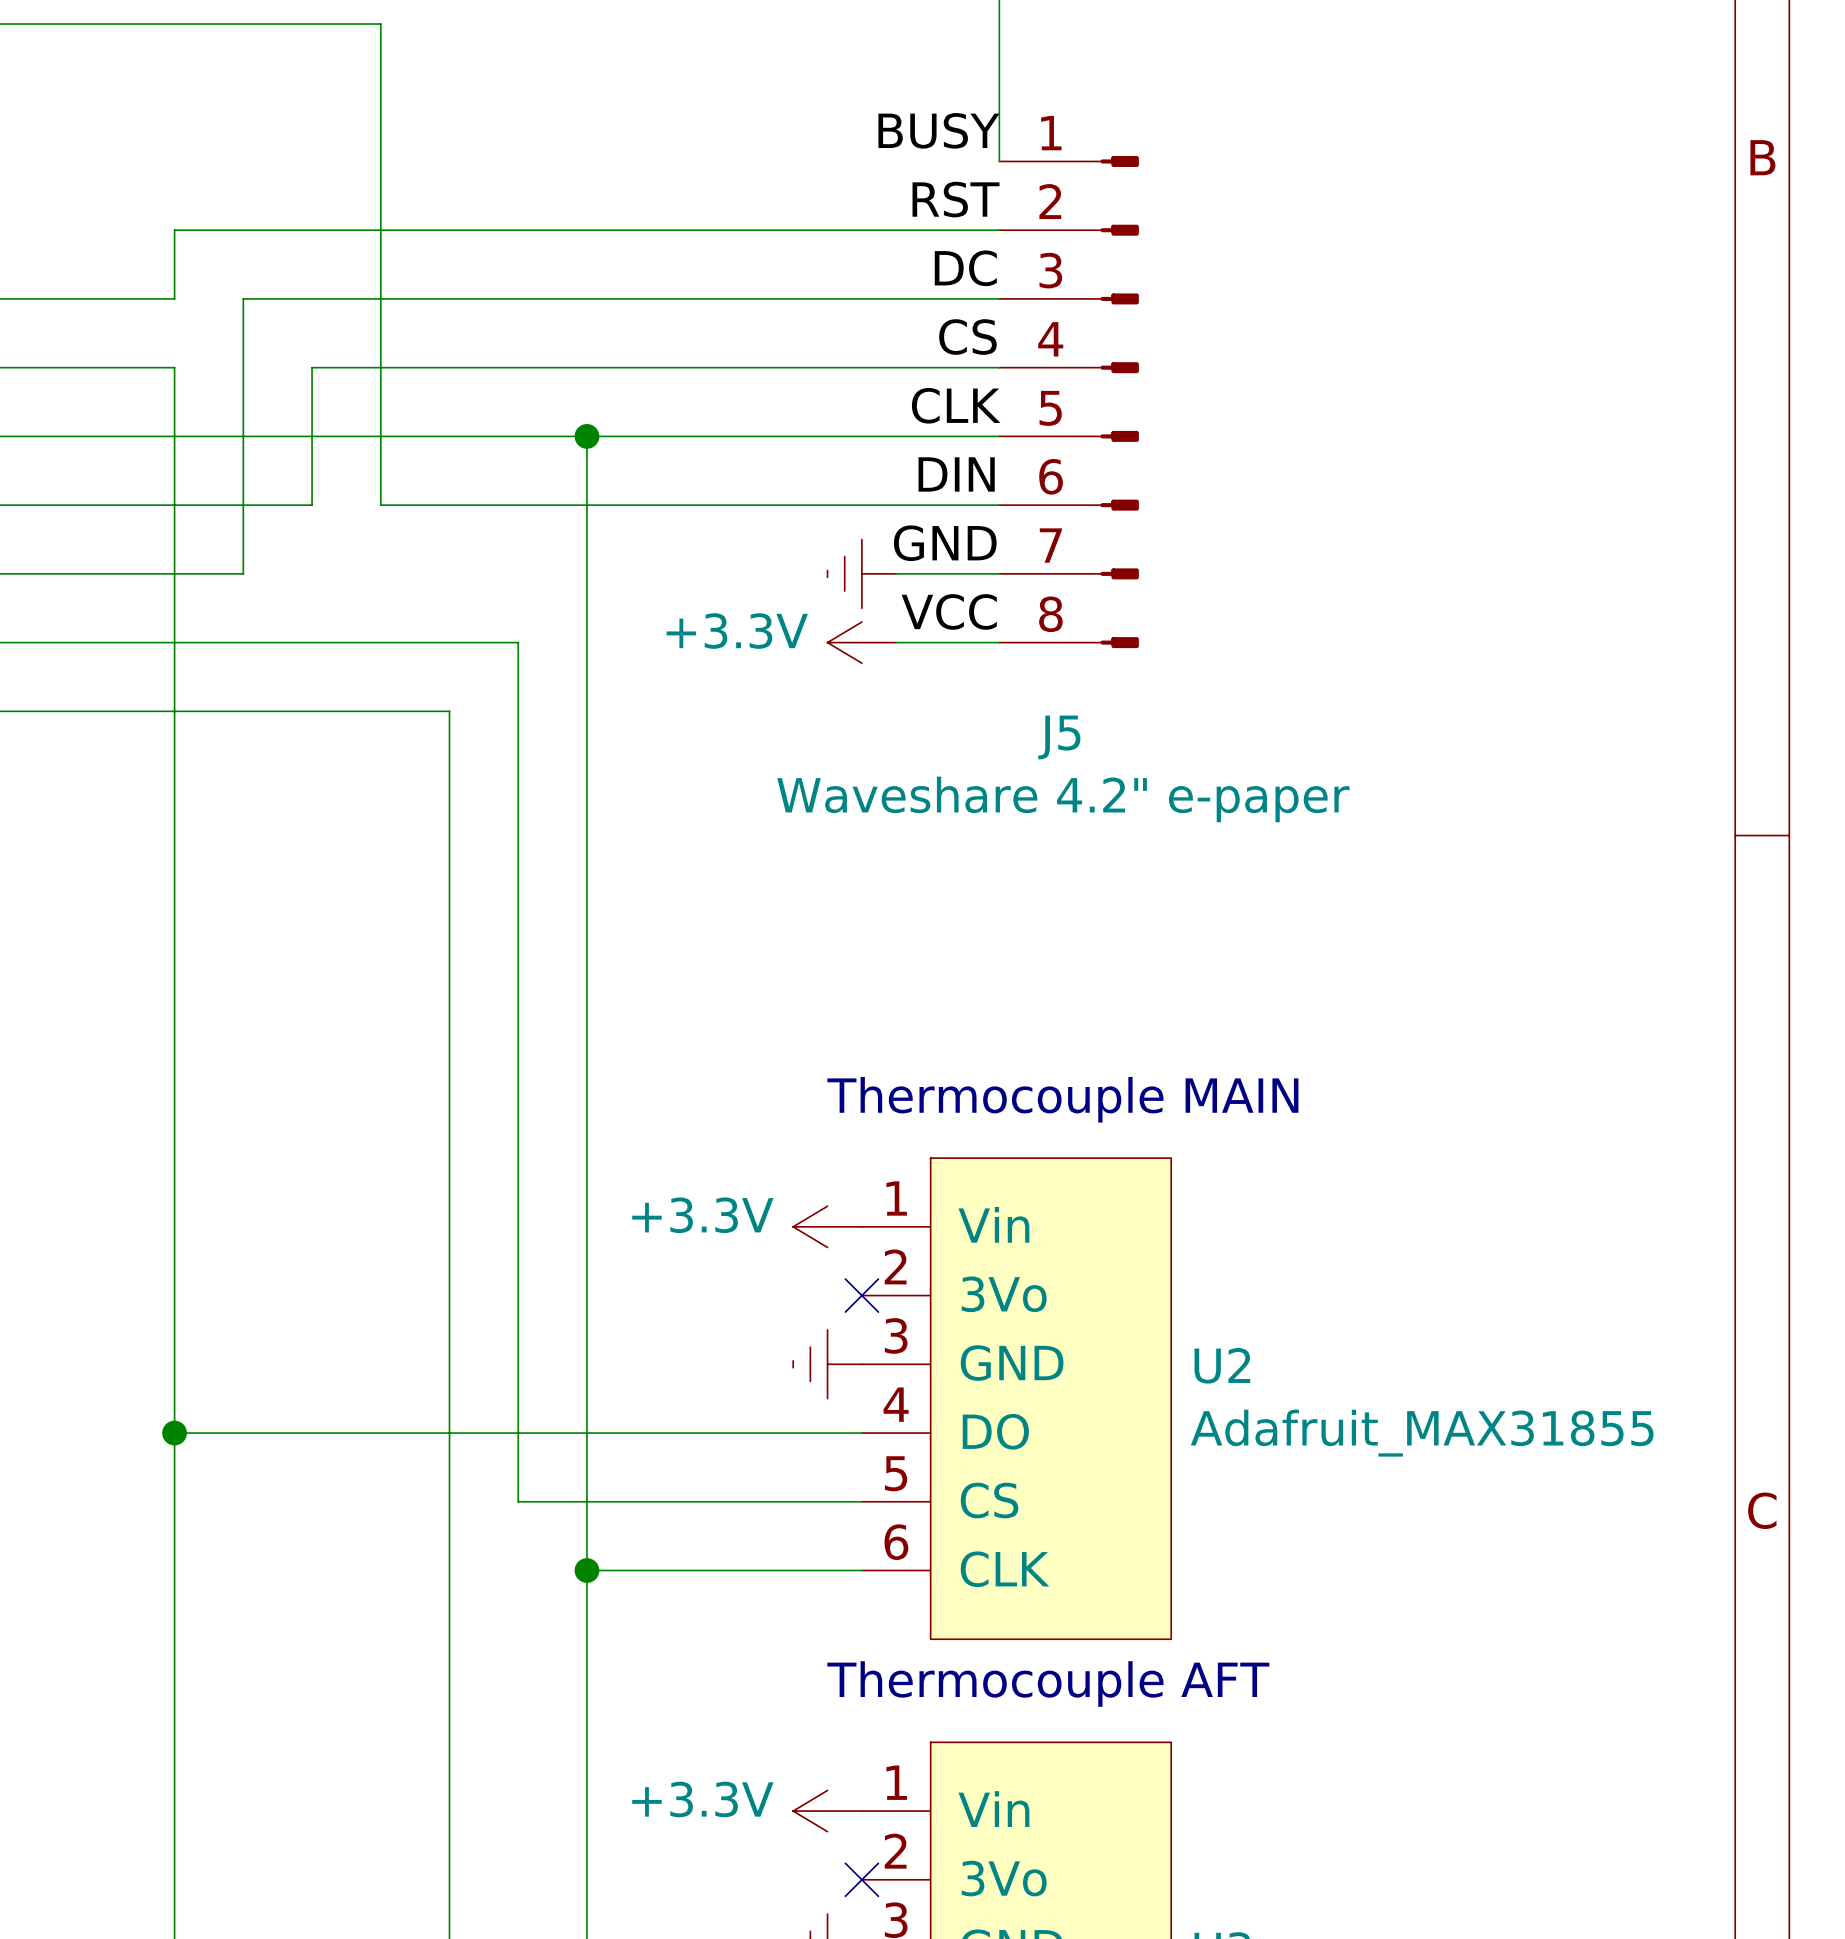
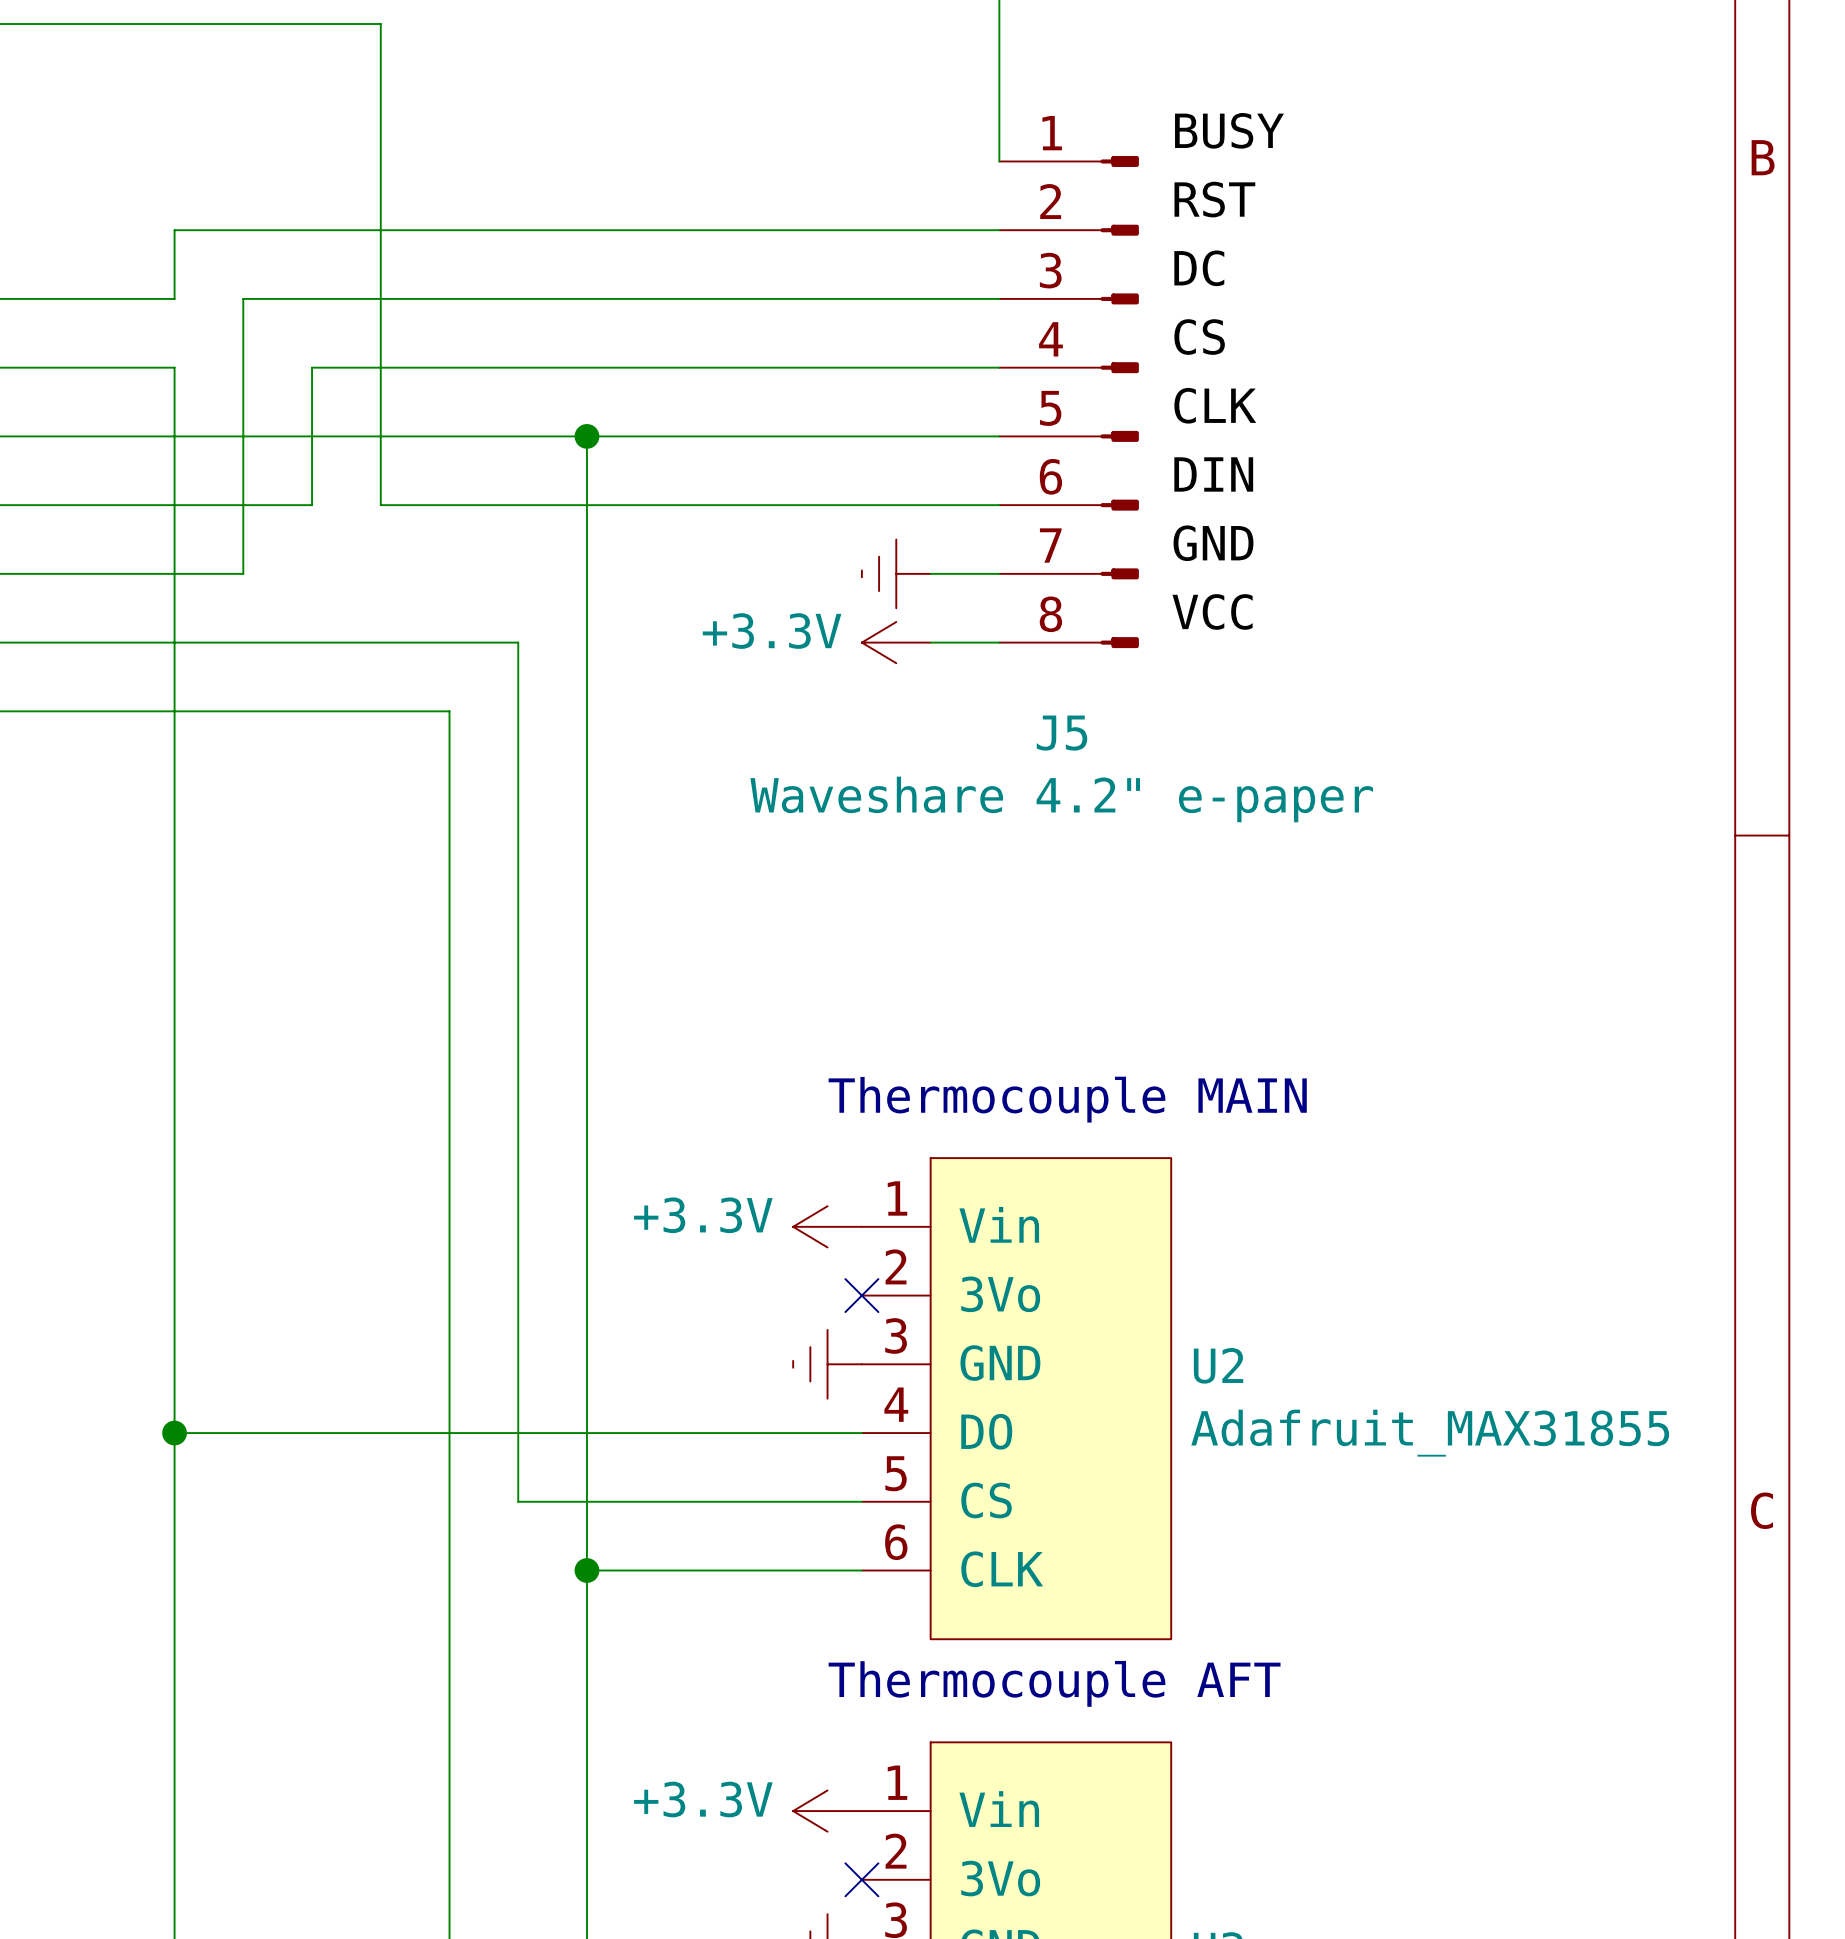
label position: BUSY (938, 130) -> BUSY (1229, 130)
label position: RST (956, 199) -> RST (1214, 199)
label position: DC (965, 268) -> DC (1199, 268)
label position: CS (967, 337) -> CS (1199, 337)
label position: CLK (956, 405) -> CLK (1215, 405)
label position: DIN (956, 474) -> DIN (1213, 474)
label position: GND (945, 543) -> GND (1213, 543)
power symbol position: (861, 573) -> (896, 573)
label position: VCC (949, 611) -> VCC (1212, 611)
power symbol position: +3.3V (861, 642) -> +3.3V (896, 642)

